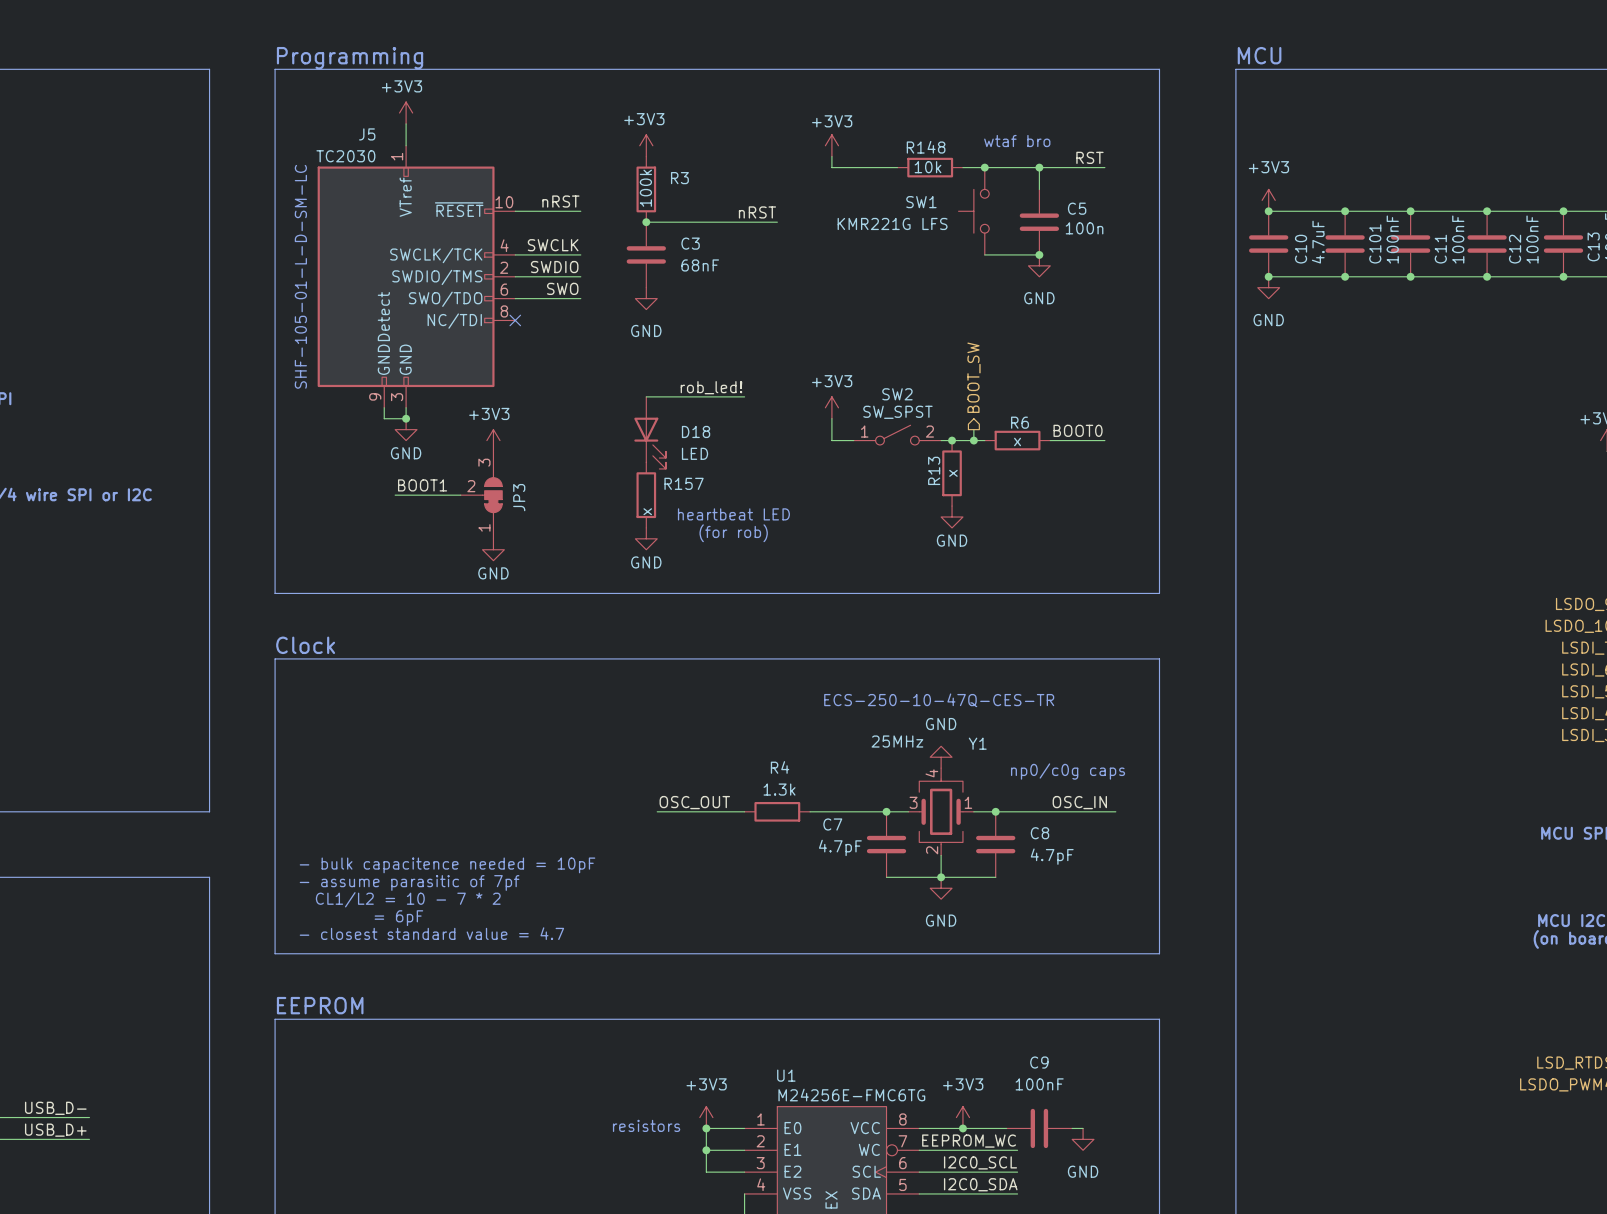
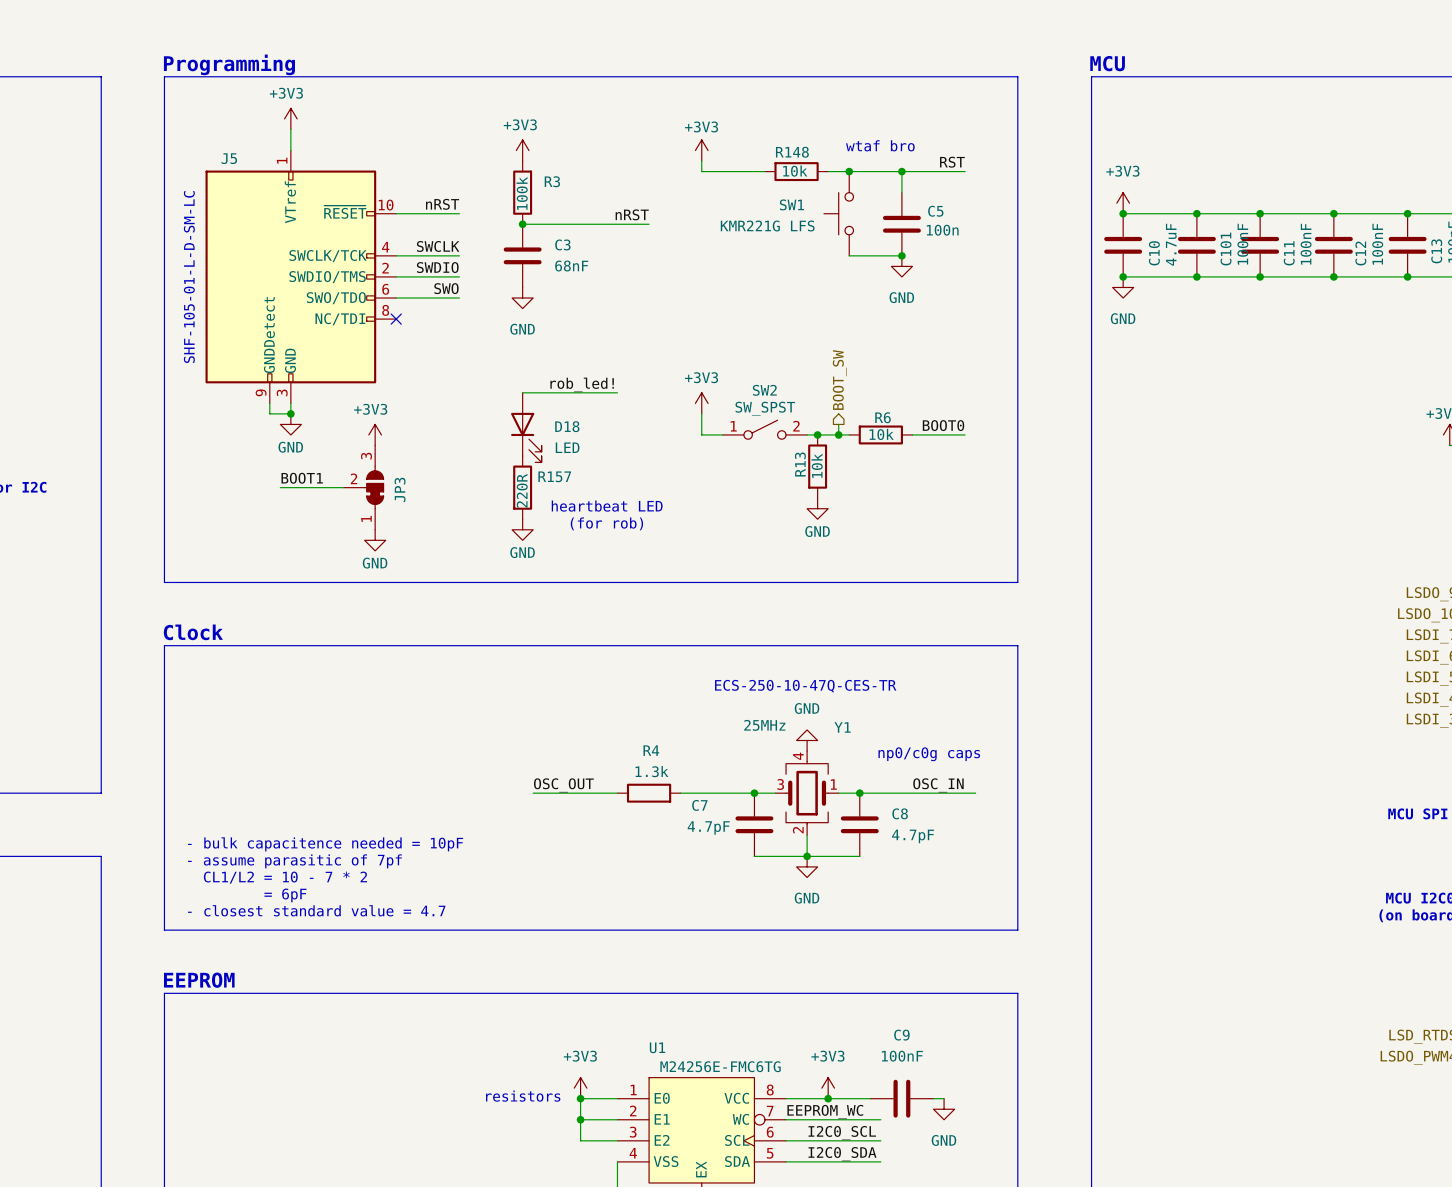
J5 name position: J5 (367, 134) -> J5 (229, 158)
J5 value: TC2030 (345, 156) -> none
R6 value: x (1017, 441) -> 10k (881, 434)
R13 value: x (953, 473) -> 10k (817, 465)
R157 value: x (647, 511) -> 220R (522, 490)

